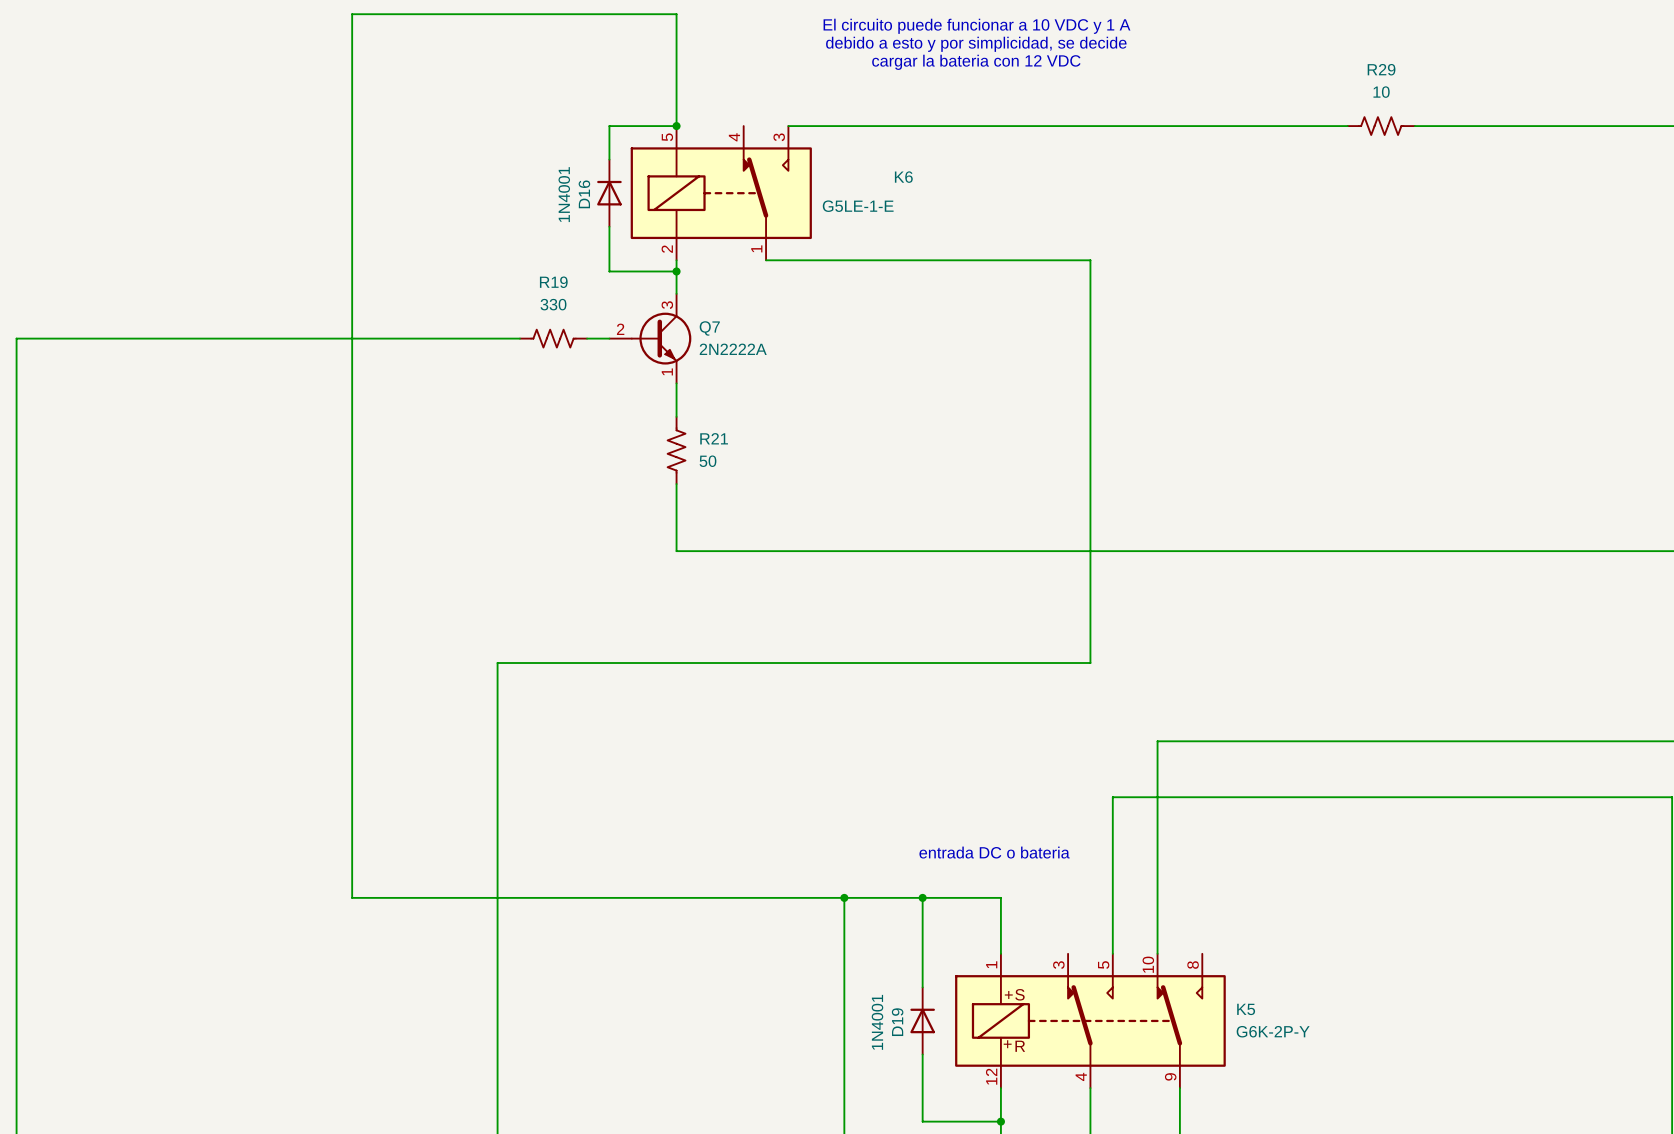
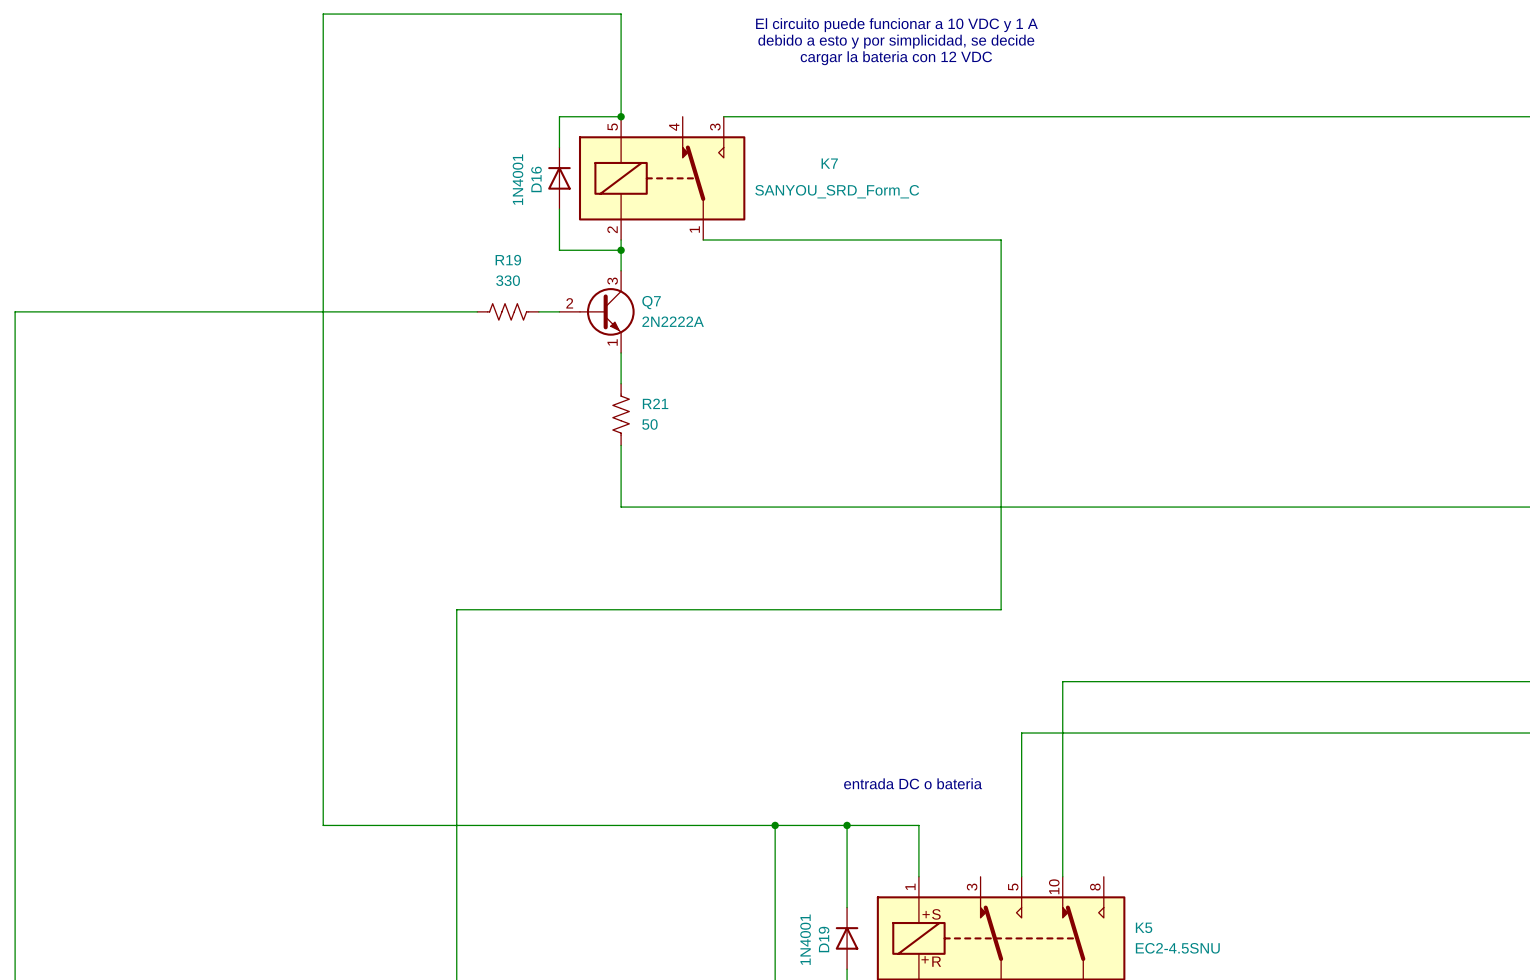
R29: 10 (1381, 126) -> none
K6 name: K6 (903, 177) -> K7 (829, 163)
K6 value: G5LE-1-E (858, 206) -> SANYOU_SRD_Form_C (837, 191)
K5 value: G6K-2P-Y (1273, 1031) -> EC2-4.5SNU (1177, 948)

